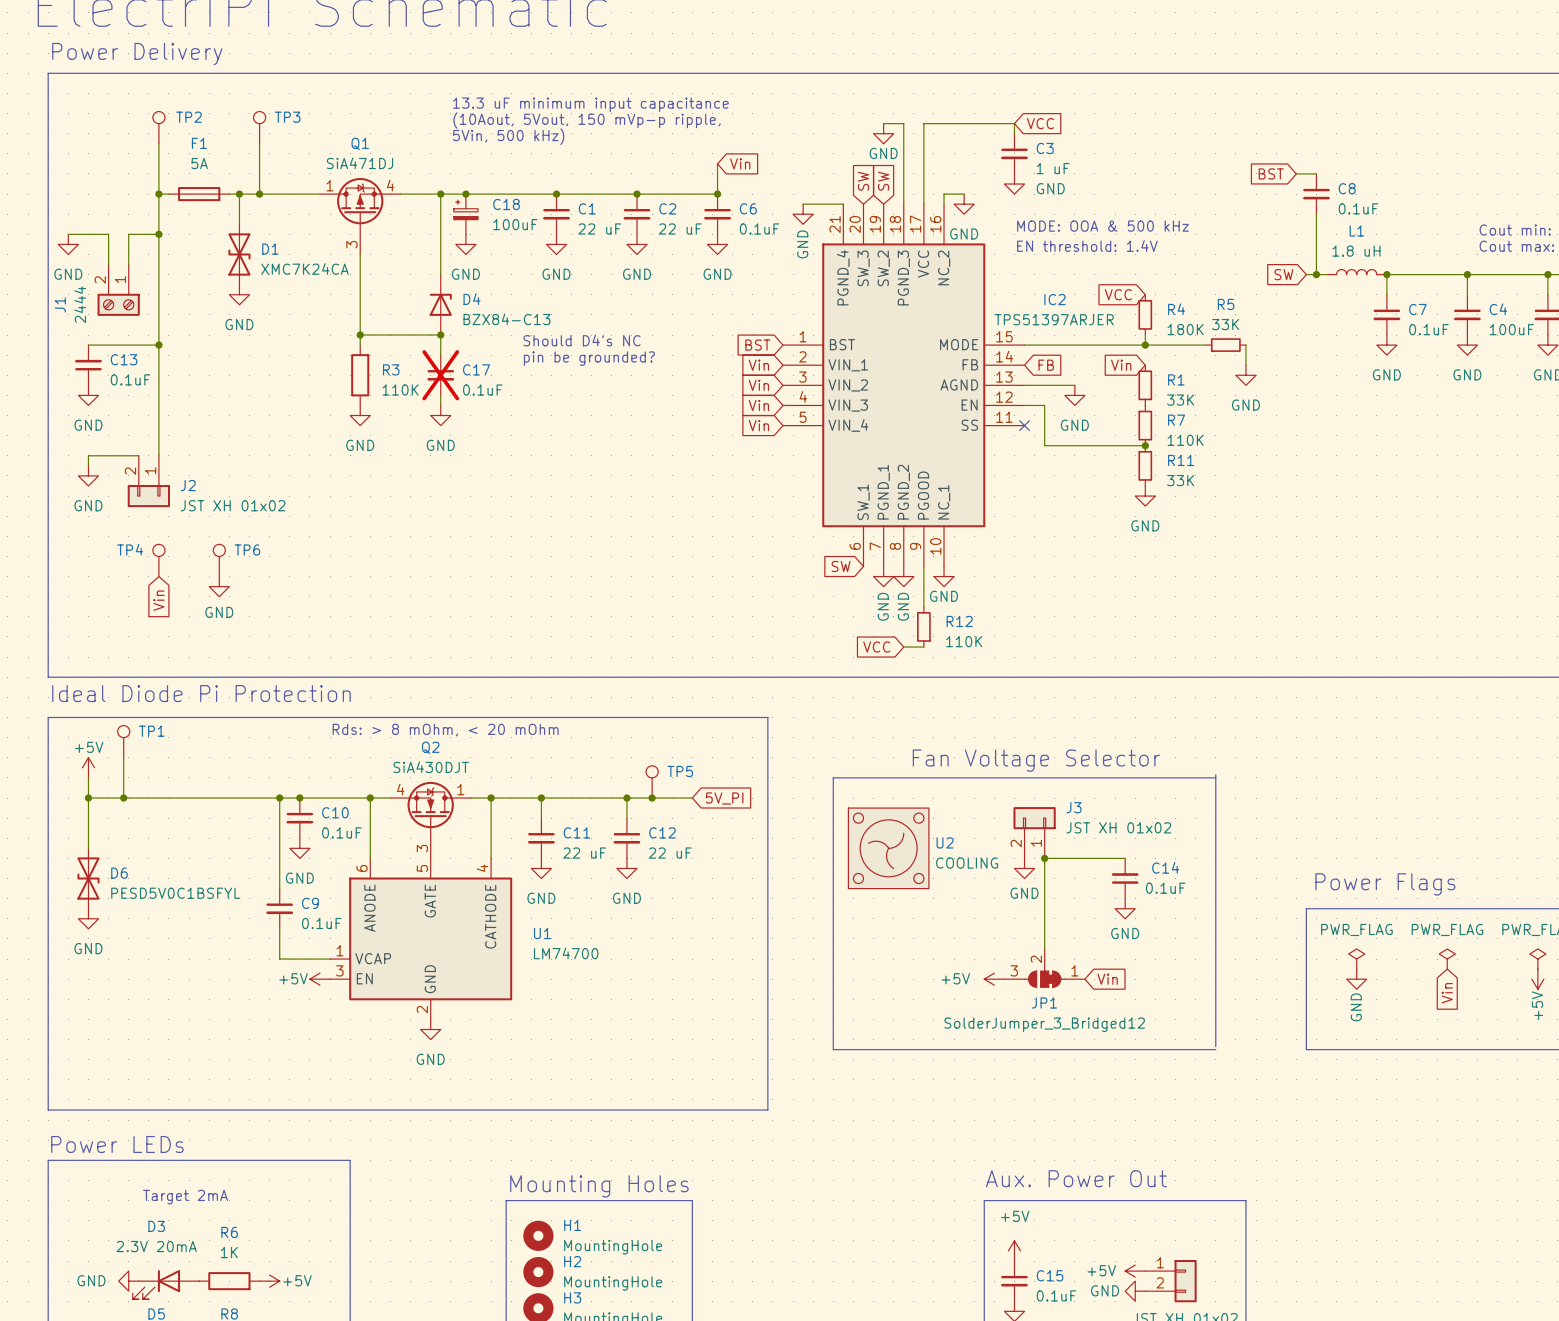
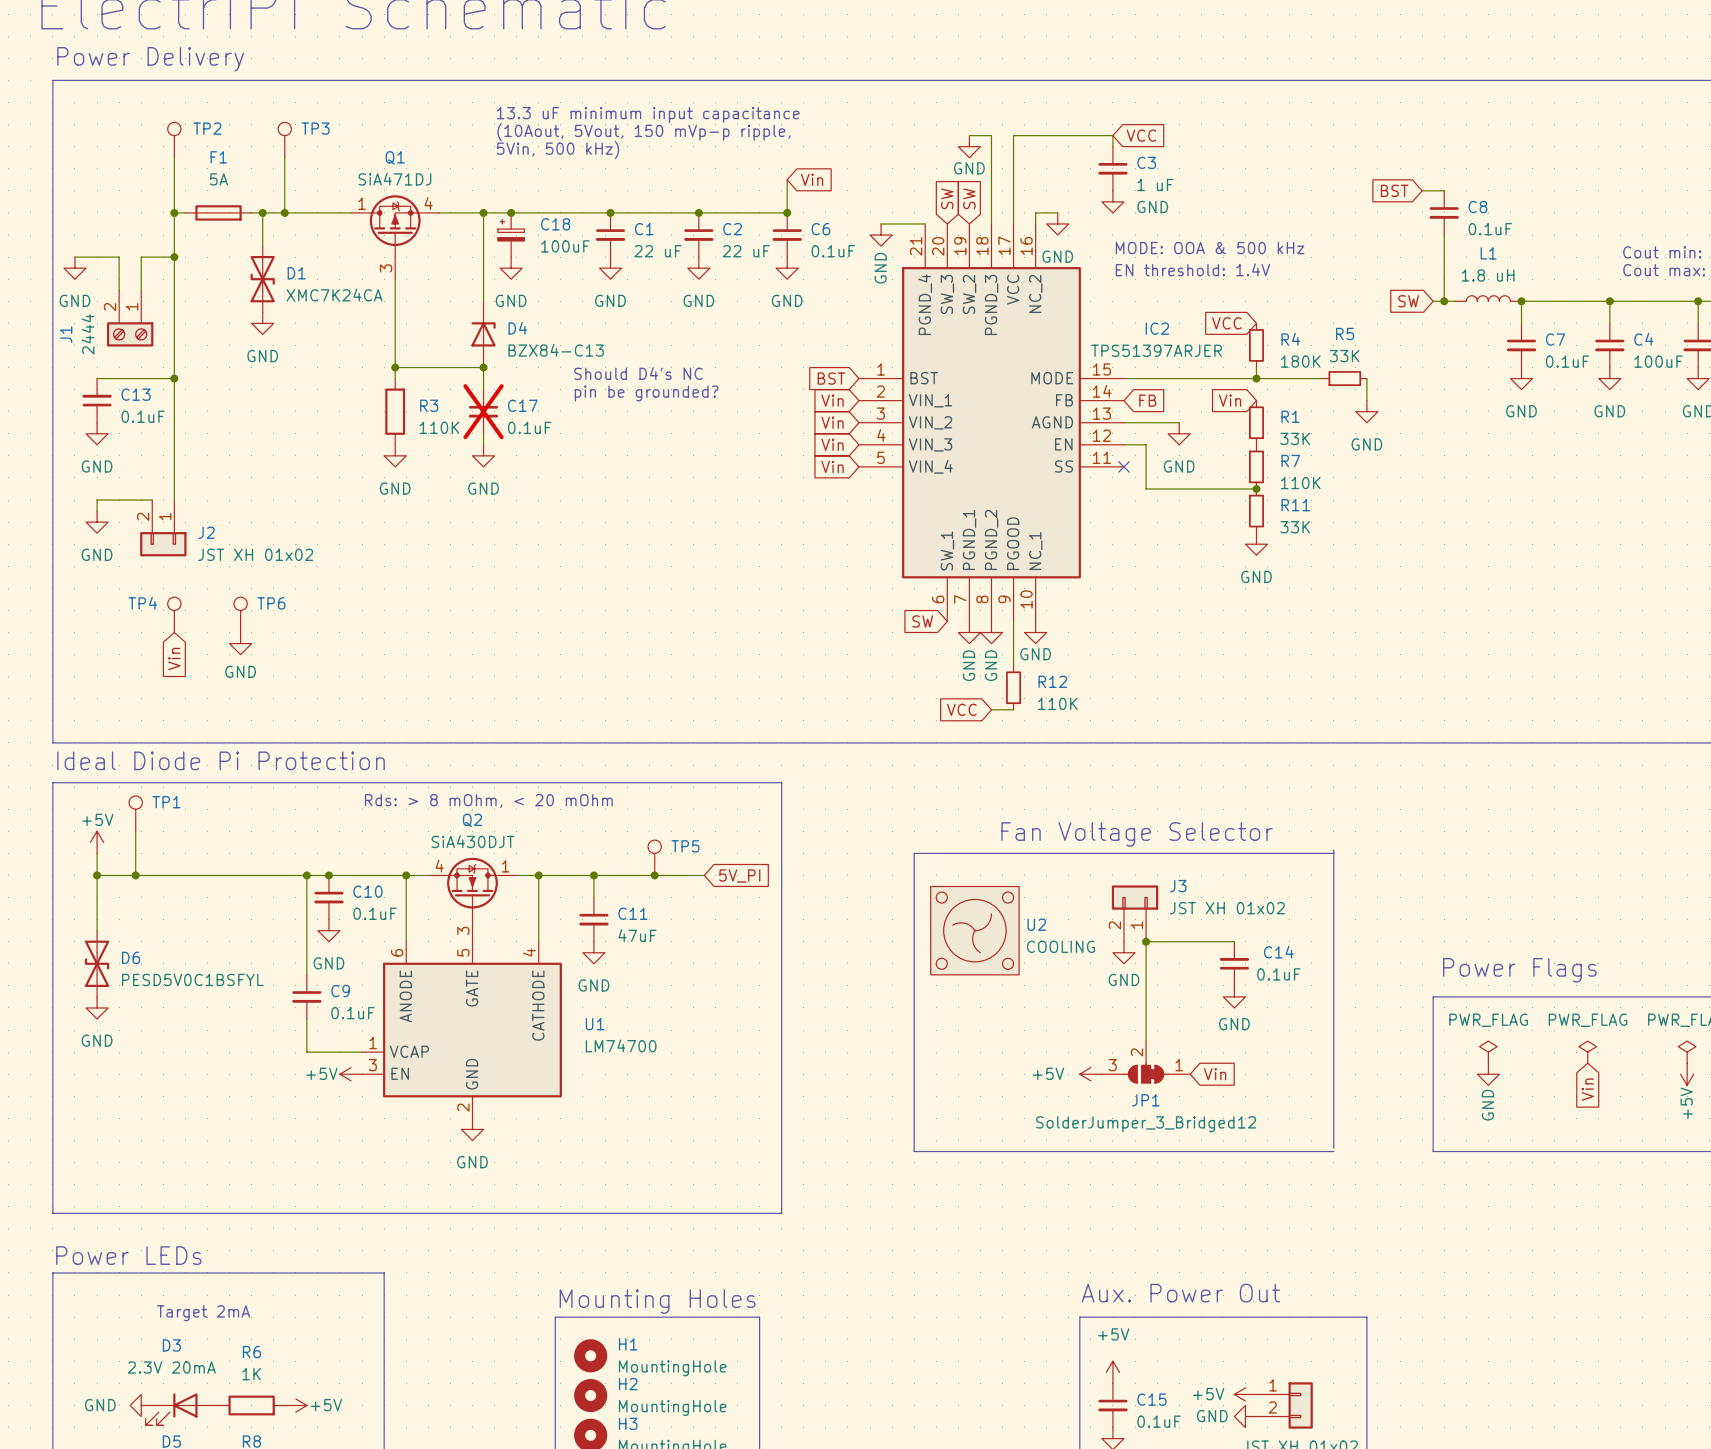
line: (48, 717) (767, 717) (767, 1110) (48, 1110) (48, 1106) -> (52, 787) (52, 782) (781, 782) (781, 1213) (52, 1213)
TP5 position: (652, 781) -> (654, 857)
junction: none -> (654, 875)
wire: (626, 798) (626, 818) -> none
junction: (626, 798) -> none
wire: (642, 798) (692, 798) -> none
junction: (652, 798) -> none
global label position: 5V_PI (724, 798) -> 5V_PI (739, 875)
C12: 22 uF (626, 838) -> none
C11 value: 22 uF (584, 853) -> 47uF (637, 935)
power symbol: GND (626, 868) -> none

